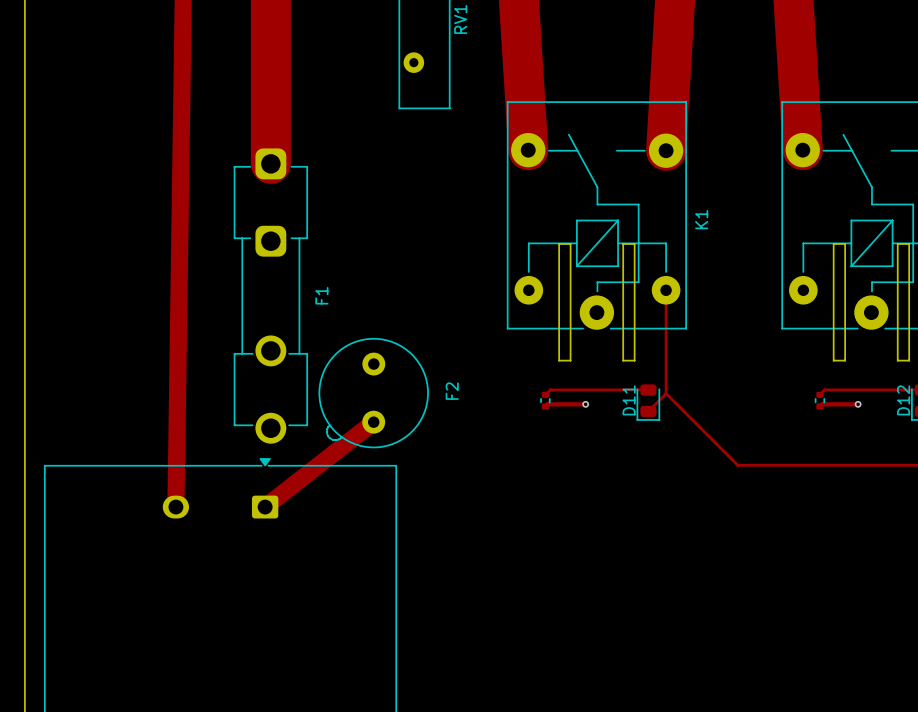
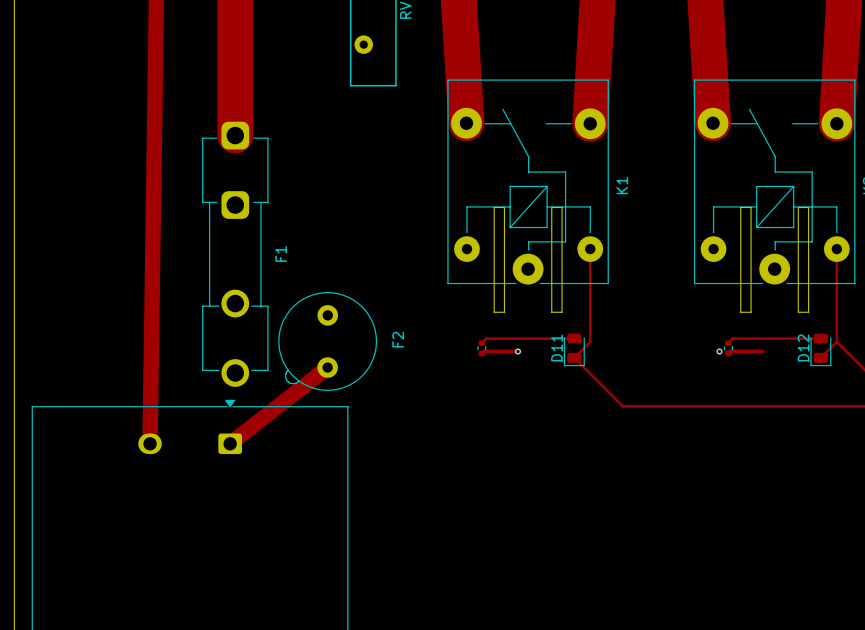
track: (666, 393) (737, 465) -> (574, 357) (622, 406) (654, 406)
via position: (858, 404) -> (719, 351)

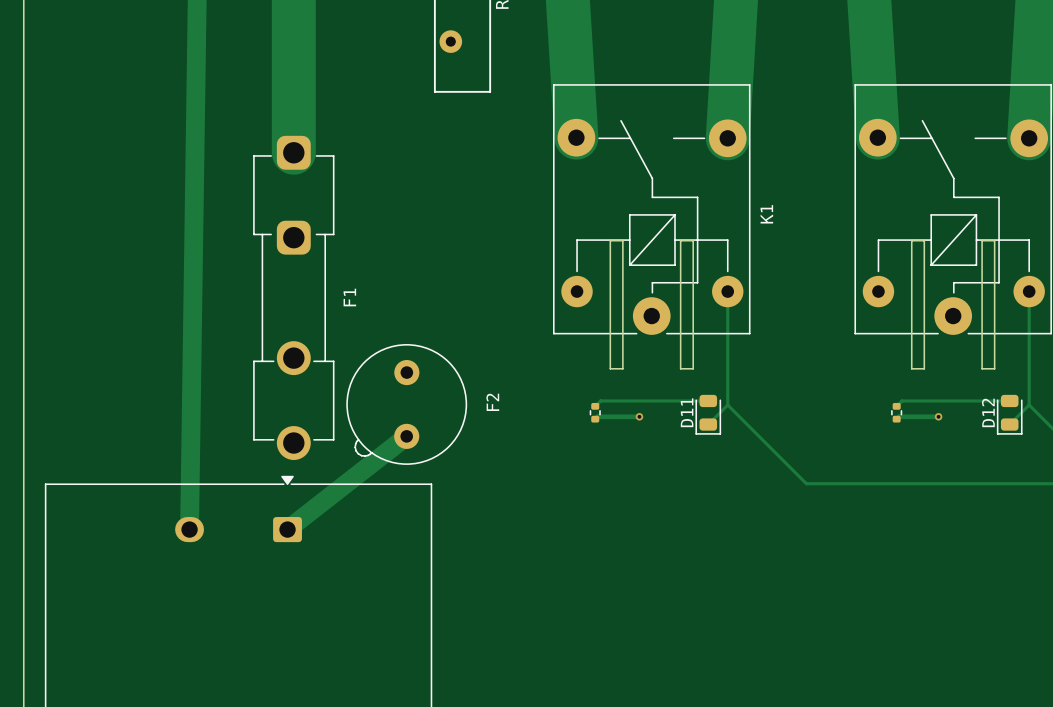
via position: (719, 351) -> (938, 416)
track: (574, 357) (622, 406) (654, 406) -> (727, 405) (806, 483)

